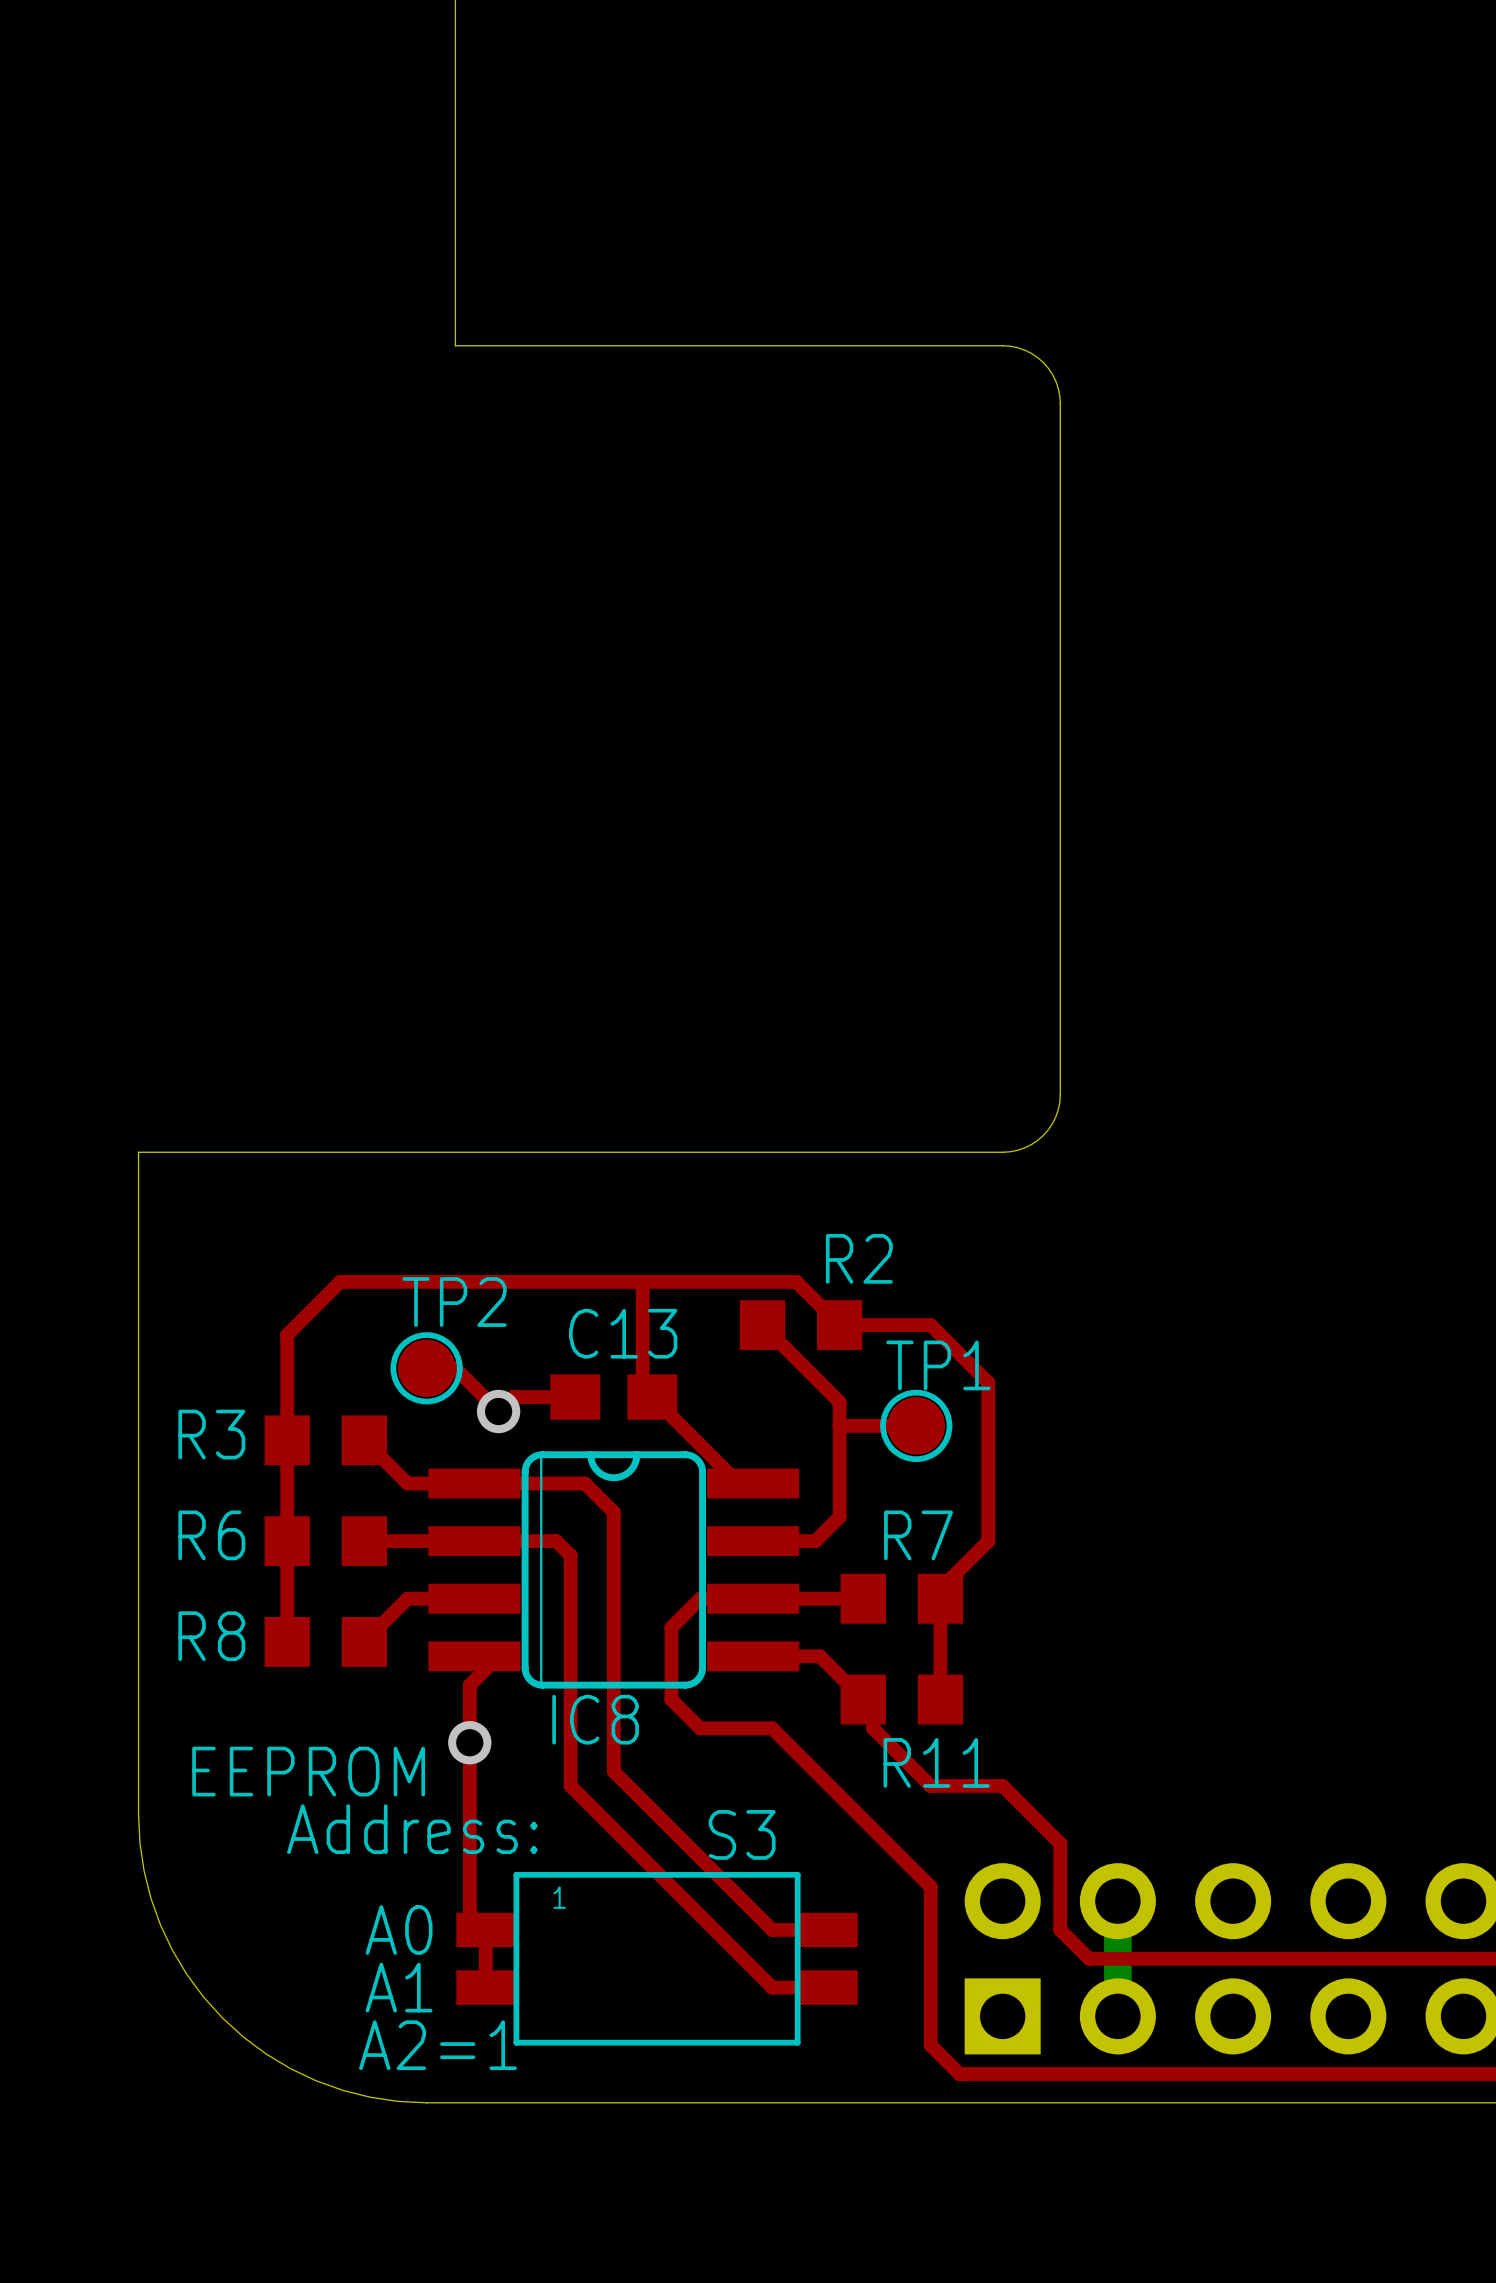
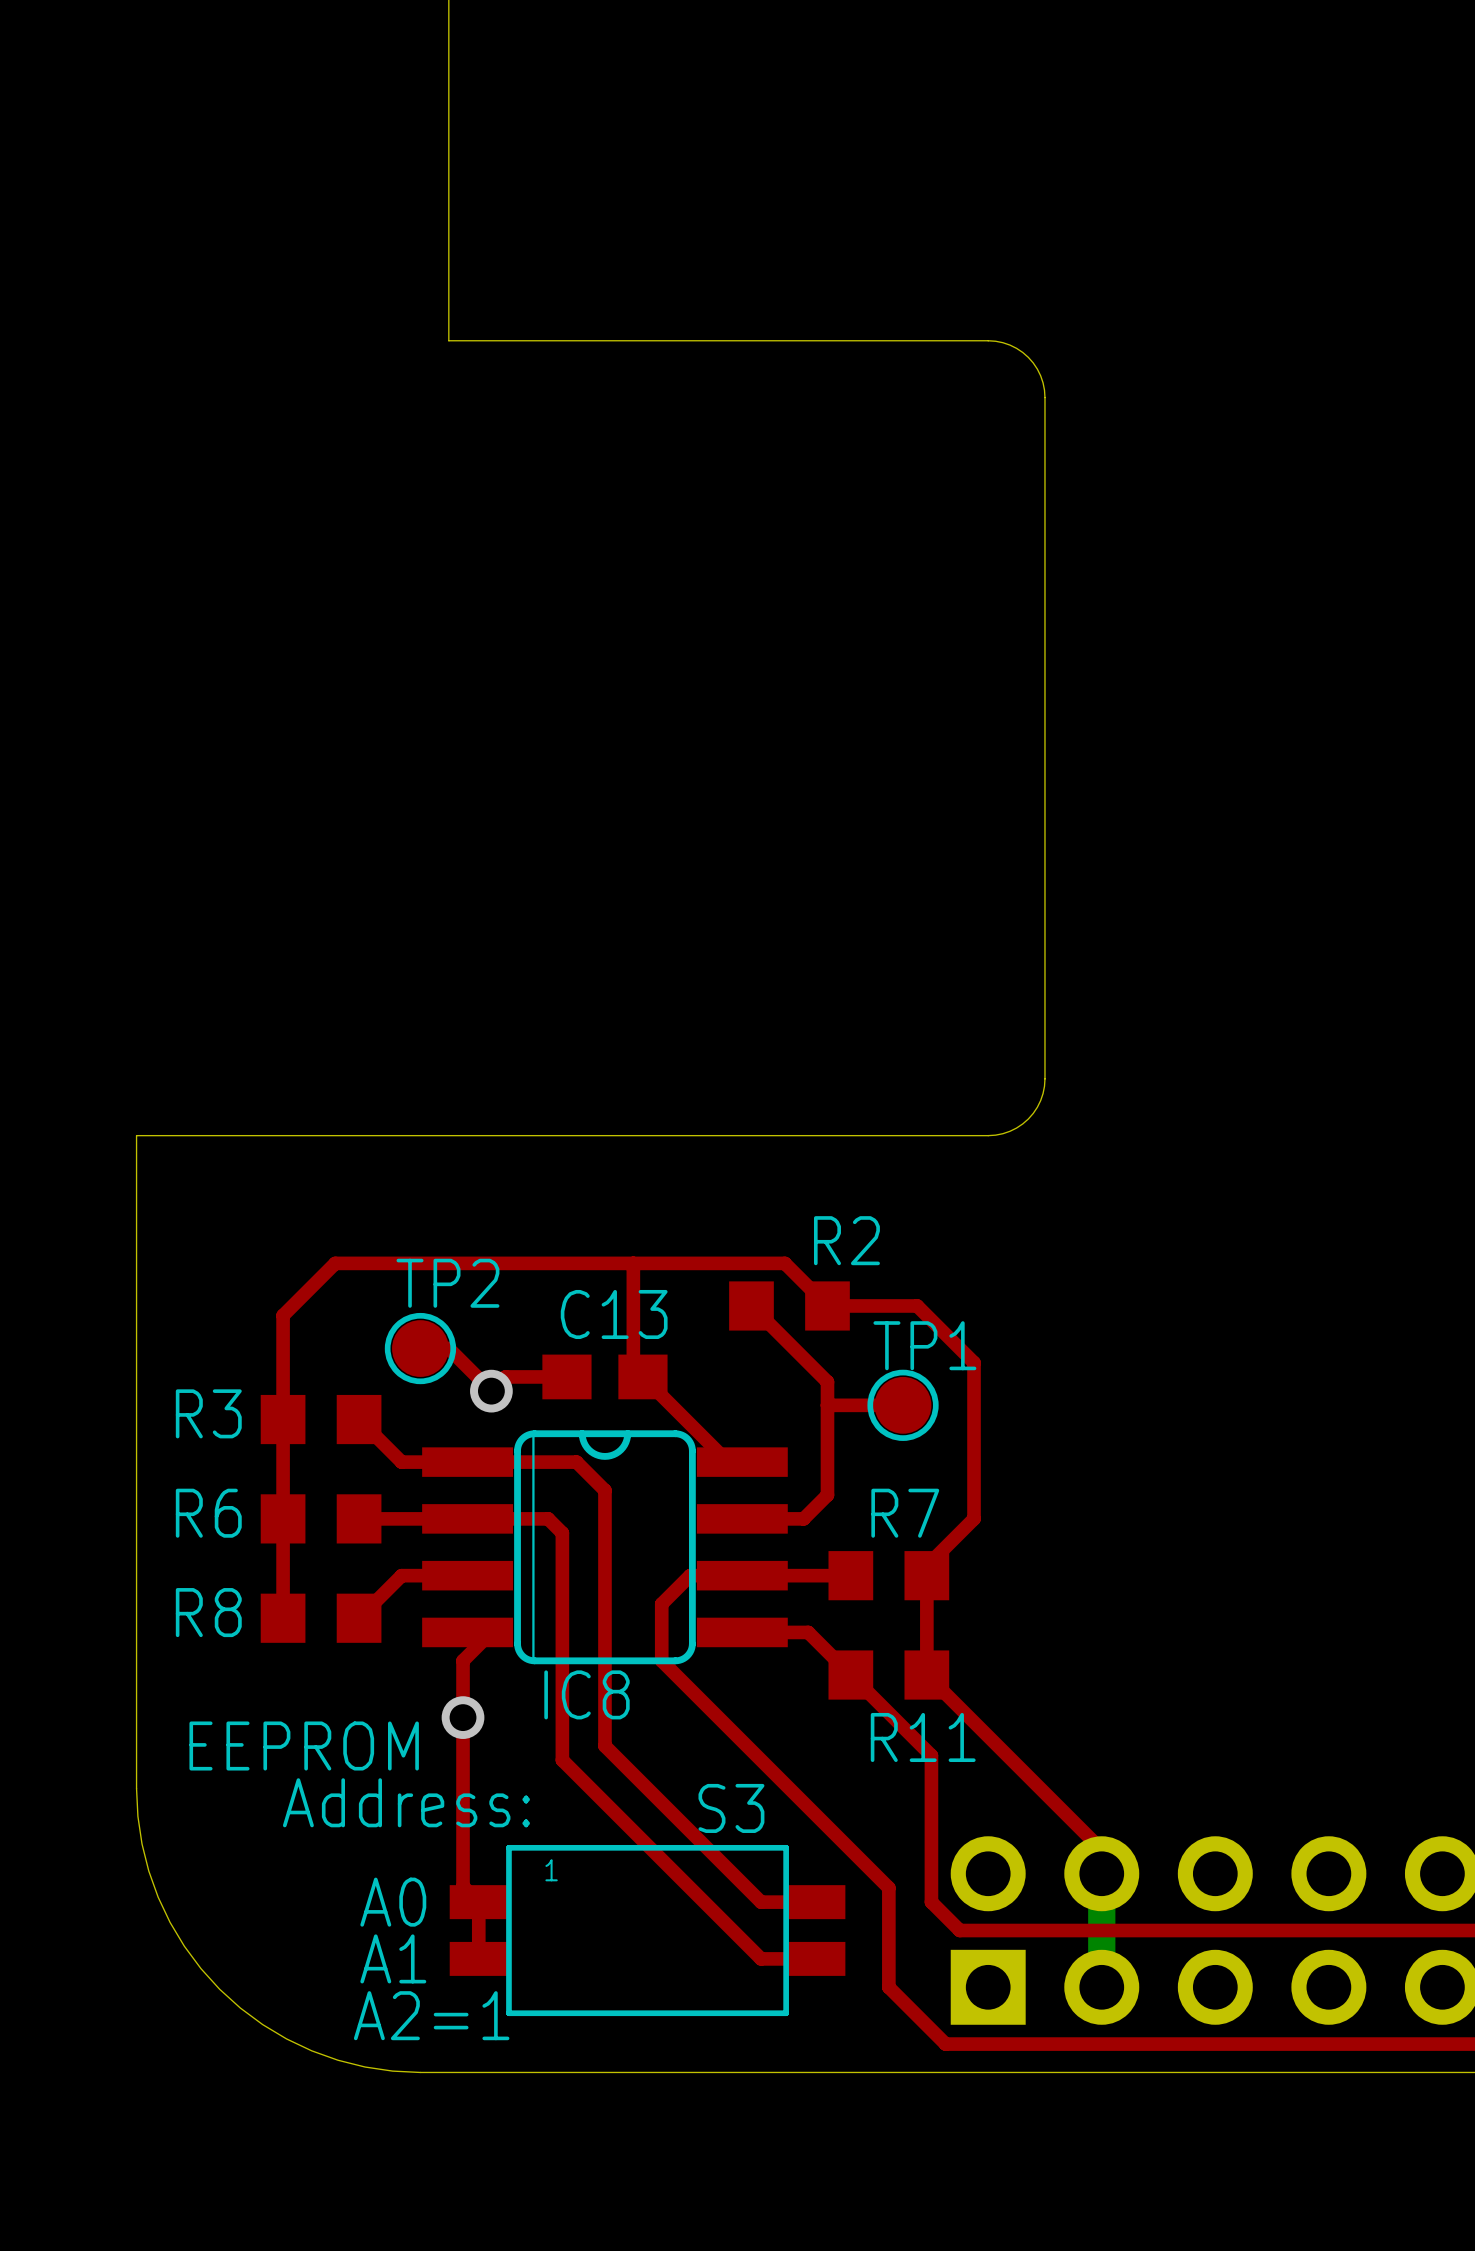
top track: (671, 1685) (671, 1699) (700, 1728) (772, 1728) (930, 1886) (930, 2045) -> (661, 1660) (888, 1887) (888, 1987) (917, 2015)
top track: none -> (926, 1675) (1101, 1849) (1101, 1873)
top track: (873, 1709) (873, 1728) (930, 1785) (1002, 1785) (1060, 1843) (1060, 1929) (1089, 1958) -> (860, 1684) (931, 1755) (931, 1902) (959, 1930) (1073, 1930)

